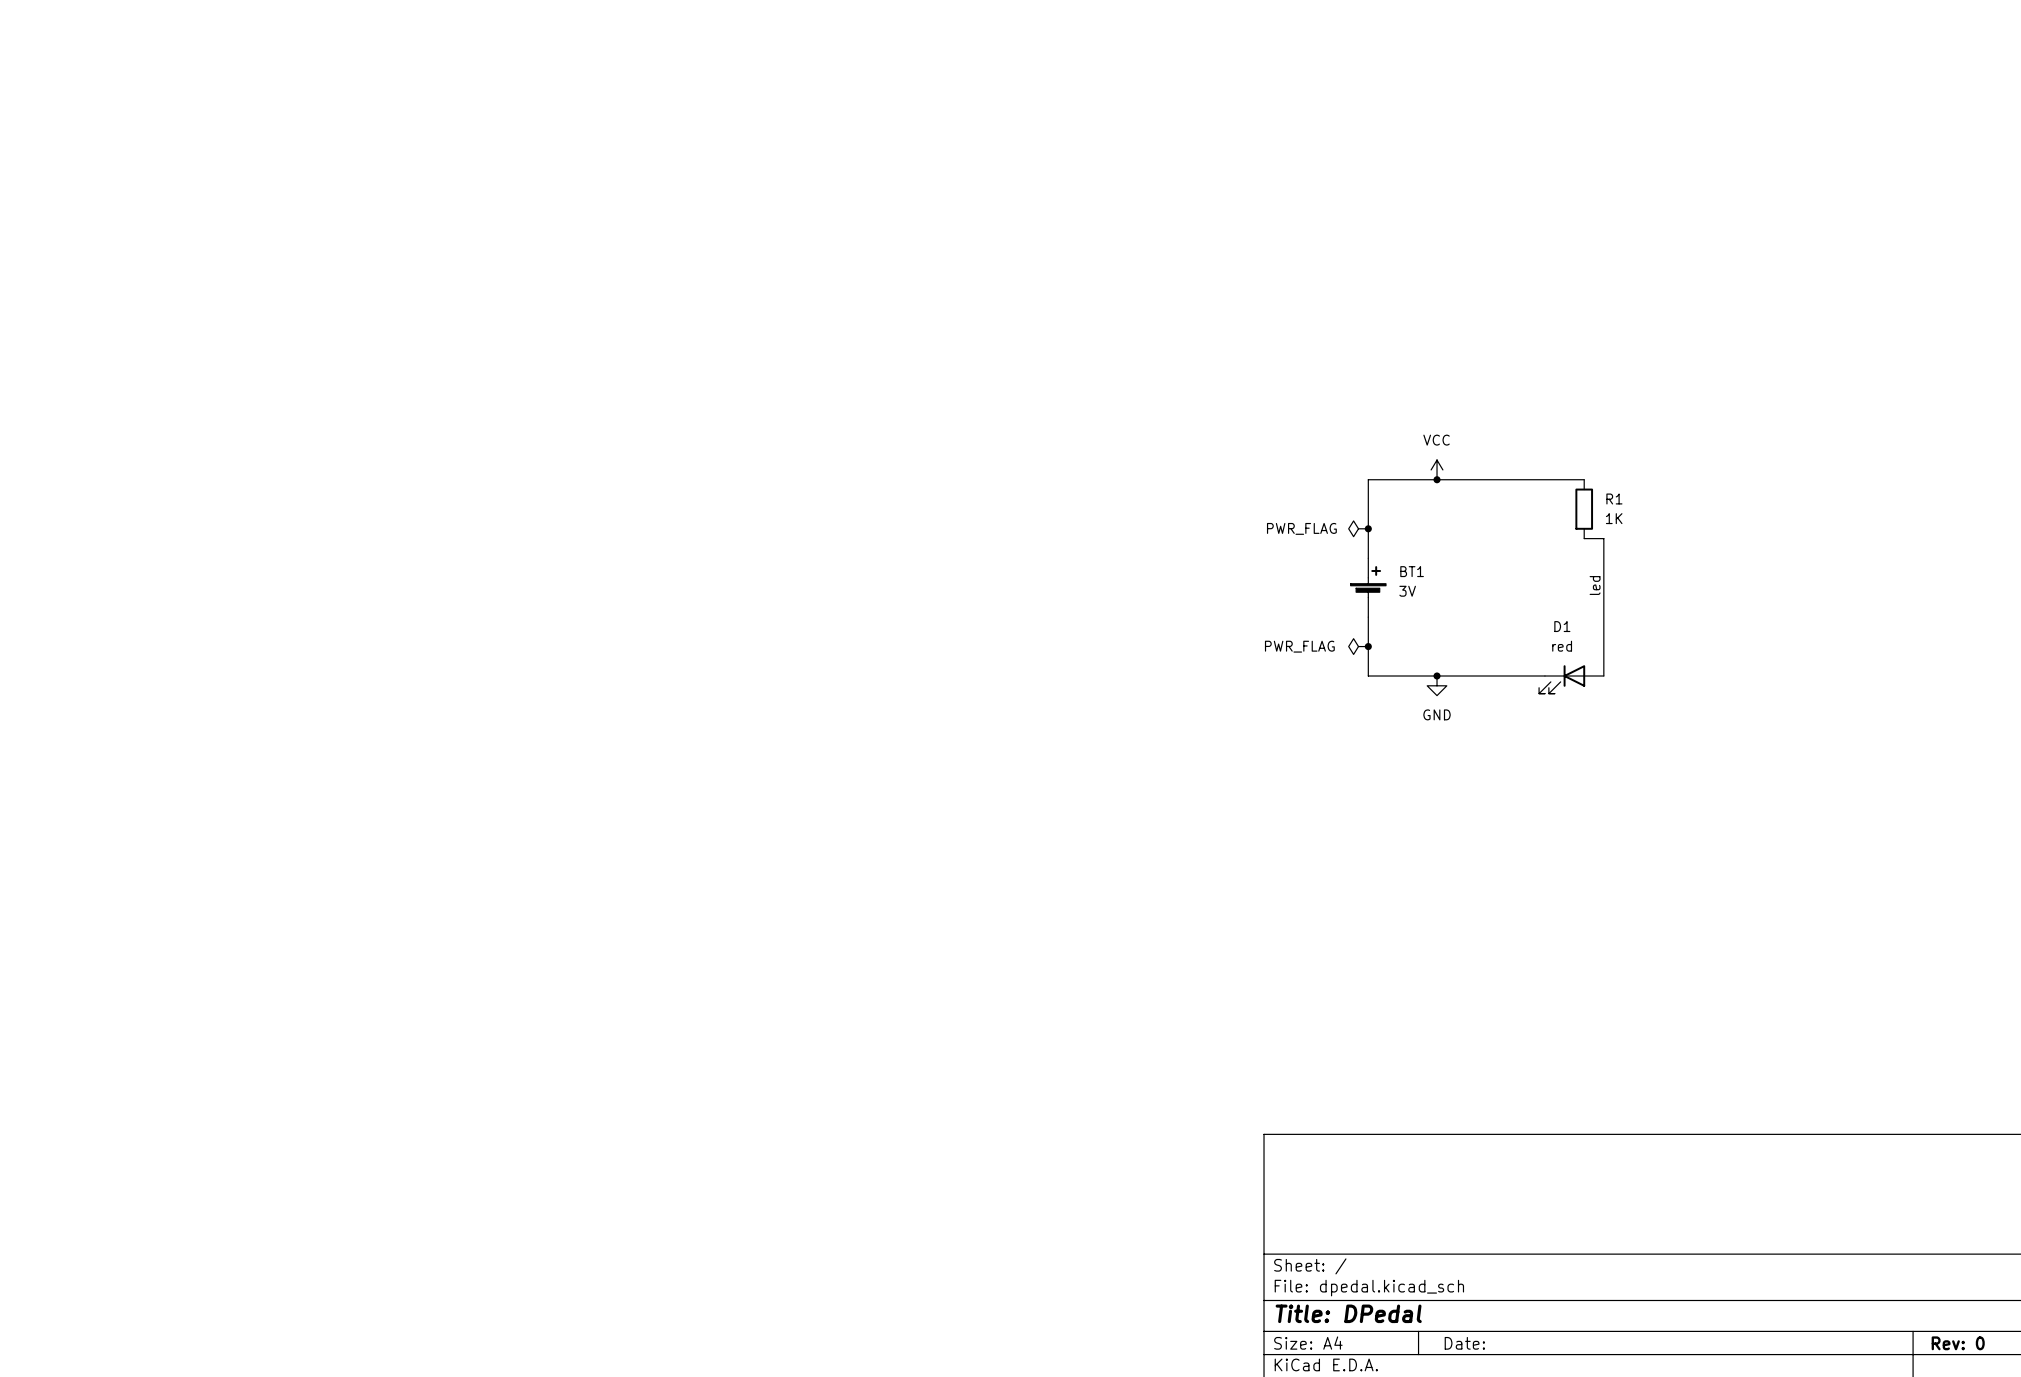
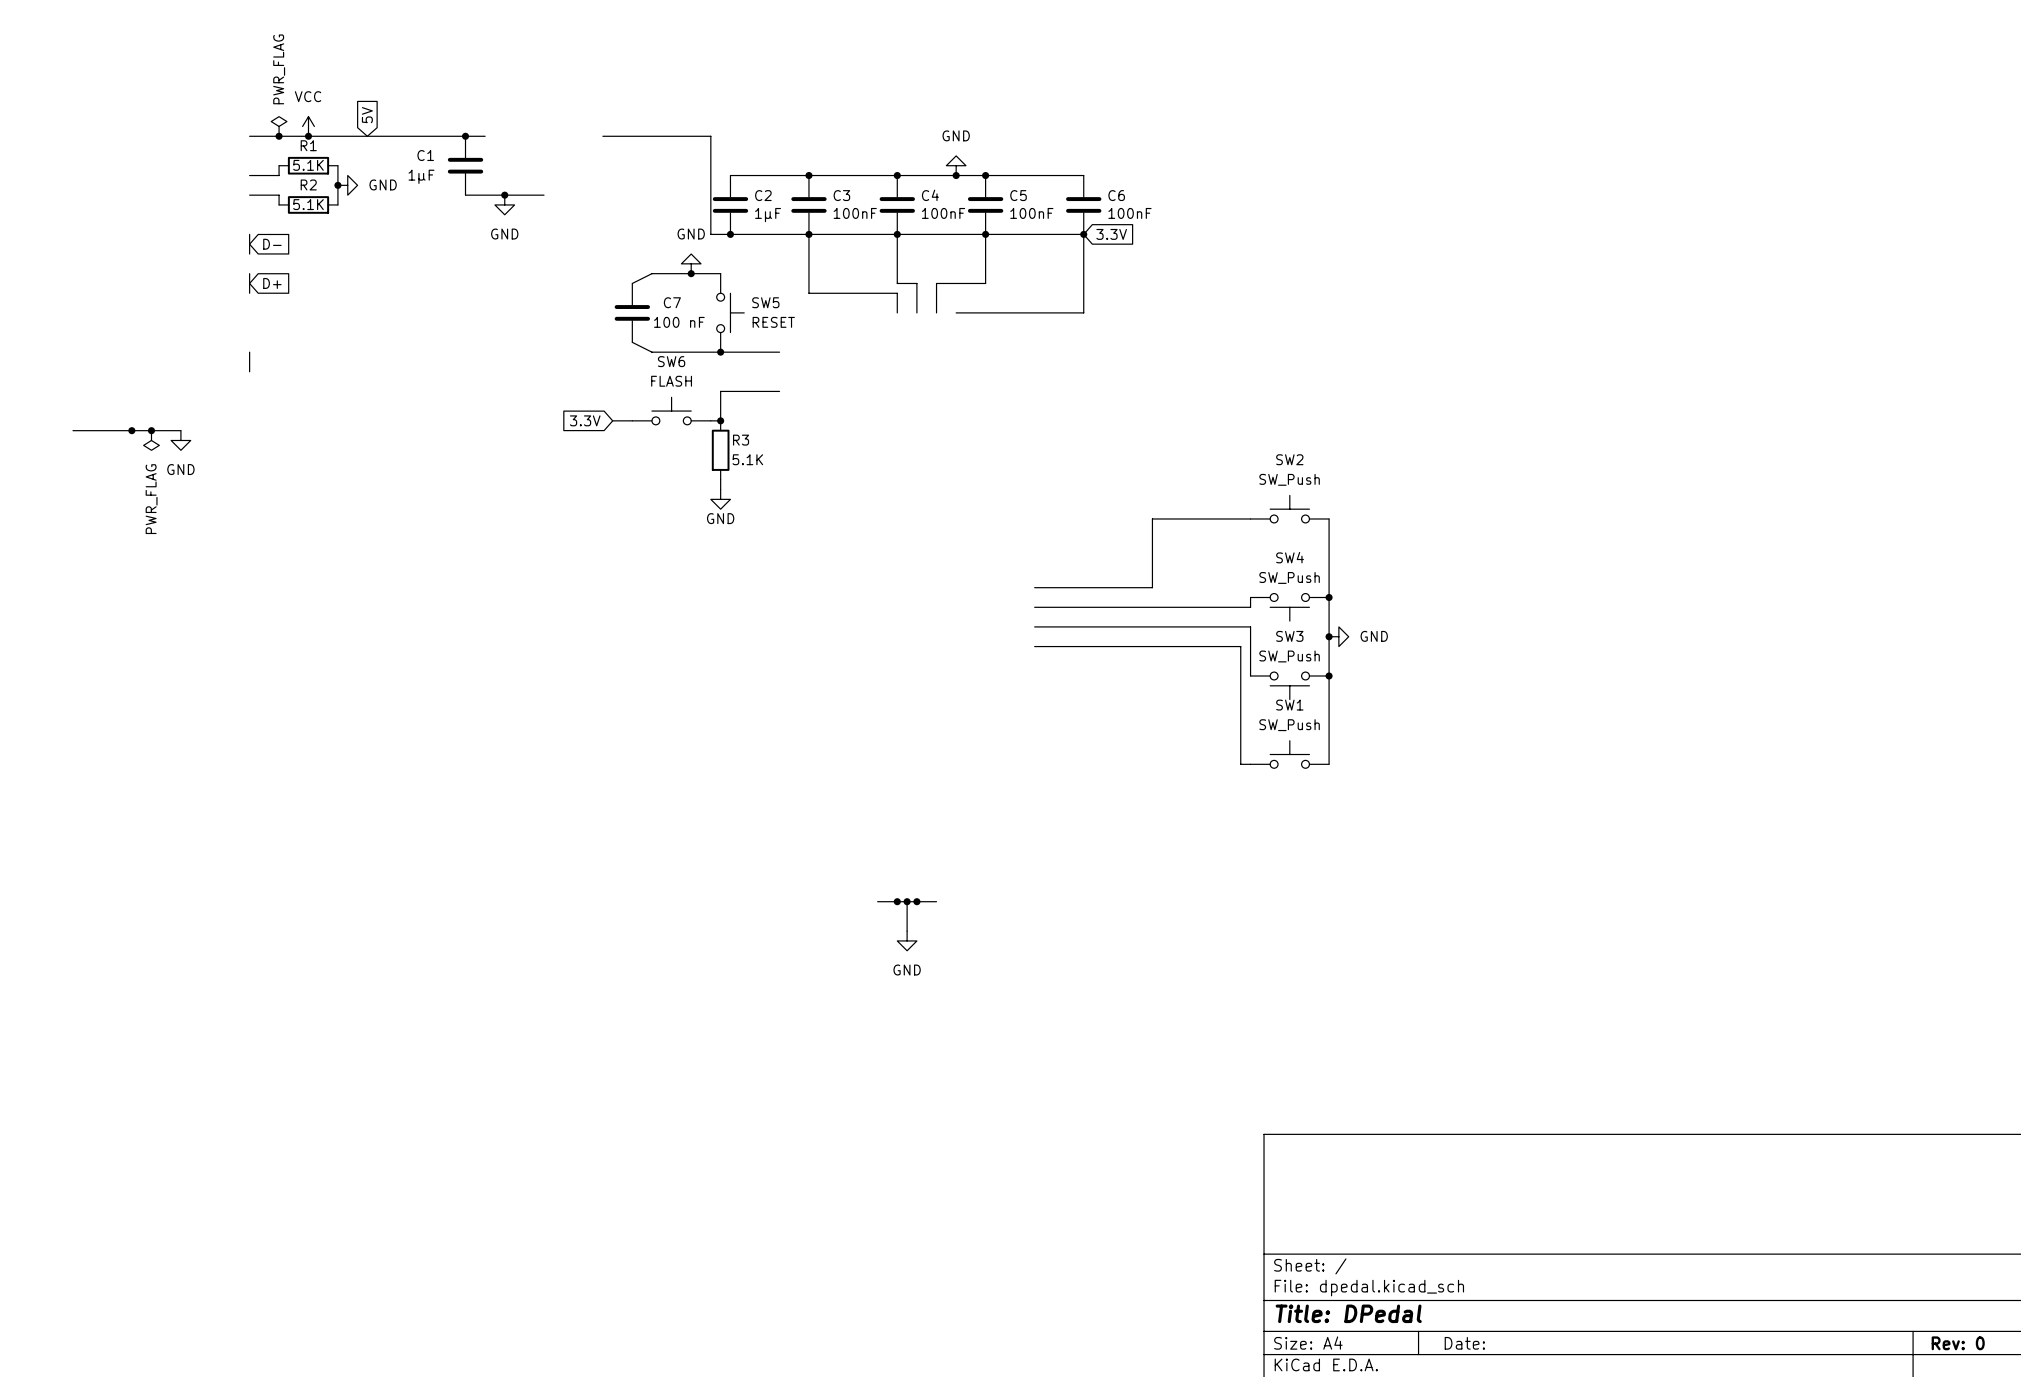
global label: none -> 5V (367, 115)
power symbol: none -> PWR_FLAG (279, 126)
power symbol: none -> VCC (308, 126)
wire: none -> (249, 136) (485, 136)
junction: none -> (279, 136)
junction: none -> (308, 136)
junction: none -> (465, 136)
wire: none -> (602, 136) (710, 136) (710, 234) (1083, 234) (1083, 312) (956, 312)
wire: none -> (279, 165) (279, 175) (249, 175)
wire: none -> (337, 165) (337, 204)
C1: none -> 1µF (465, 165)
power symbol: none -> GND (956, 165)
wire: none -> (730, 175) (1083, 175)
junction: none -> (808, 175)
junction: none -> (897, 175)
junction: none -> (956, 175)
junction: none -> (985, 175)
junction: none -> (337, 185)
power symbol: none -> GND (347, 185)
wire: none -> (249, 195) (279, 195) (279, 204)
wire: none -> (465, 195) (544, 195)
junction: none -> (504, 195)
R2: none -> 5.1K (308, 204)
power symbol: none -> GND (504, 204)
C2: none -> 1µF (730, 204)
C3: none -> 100nF (808, 204)
C4: none -> 100nF (897, 204)
C5: none -> 100nF (985, 204)
C6: none -> 100nF (1083, 204)
wire: none -> (249, 234) (249, 254)
junction: none -> (730, 234)
wire: none -> (808, 234) (808, 293) (897, 293) (897, 312)
junction: none -> (808, 234)
wire: none -> (897, 234) (897, 283) (916, 283) (916, 312)
junction: none -> (897, 234)
wire: none -> (985, 234) (985, 283) (936, 283) (936, 312)
junction: none -> (985, 234)
junction: none -> (1083, 234)
global label: none -> 3.3V (1111, 234)
global label: none -> D- (272, 244)
power symbol: none -> GND (691, 263)
wire: none -> (249, 273) (249, 293)
junction: none -> (691, 273)
wire: none -> (720, 273) (651, 273) (632, 283)
global label: none -> D+ (272, 283)
C7: none -> 100 nF (632, 312)
SW5: none -> RESET (730, 312)
wire: none -> (632, 342) (651, 352) (779, 352)
wire: none -> (249, 352) (249, 371)
junction: none -> (720, 352)
wire: none -> (779, 391) (720, 391) (720, 420) (710, 420)
SW6: none -> FLASH (671, 411)
global label: none -> 3.3V (585, 420)
wire: none -> (612, 420) (632, 420)
junction: none -> (720, 420)
wire: none -> (72, 430) (180, 430)
junction: none -> (131, 430)
junction: none -> (151, 430)
power symbol: none -> PWR_FLAG (151, 440)
power symbol: none -> GND (180, 440)
R3: none -> 5.1K (720, 450)
power symbol: VCC (1437, 469) -> none
wire: none -> (720, 479) (720, 489)
junction: (1437, 479) -> none
wire: (1584, 479) (1368, 479) (1368, 558) -> none
R1 name position: R1 (1614, 498) -> R1 (308, 145)
power symbol: none -> GND (720, 499)
SW2: none -> SW_Push (1289, 509)
R1 rotation: 0° (1584, 509) -> 90° clockwise (308, 165)
R1 position: (1584, 509) -> (308, 165)
wire: none -> (1250, 518) (1152, 518) (1152, 587) (1034, 587)
wire: none -> (1329, 518) (1329, 764)
R1 value: 1K (1614, 518) -> 5.1K (308, 165)
power symbol: PWR_FLAG (1358, 528) -> none
junction: (1368, 528) -> none
wire: (1584, 538) (1603, 538) (1603, 676) -> none
label: led (1595, 585) -> none
BT1: 3V (1368, 587) -> none
wire: none -> (1250, 597) (1250, 607) (1034, 607)
junction: none -> (1329, 597)
SW4: none -> SW_Push (1289, 607)
wire: (1368, 617) (1368, 676) (1544, 676) -> none
wire: none -> (1034, 626) (1250, 626) (1250, 676)
junction: none -> (1329, 636)
wire: none -> (1034, 646) (1240, 646) (1240, 764) (1250, 764)
power symbol: PWR_FLAG (1358, 646) -> none
junction: (1368, 646) -> none
junction: none -> (1329, 676)
junction: (1437, 676) -> none
D1: red (1571, 679) -> none
SW3: none -> SW_Push (1289, 685)
power symbol rotation: 0° (1437, 685) -> 90° counterclockwise (1338, 636)
power symbol position: GND (1437, 685) -> GND (1338, 636)
SW1: none -> SW_Push (1289, 754)
wire: none -> (877, 901) (936, 901)
junction: none -> (897, 901)
wire: none -> (907, 901) (907, 931)
junction: none -> (907, 901)
junction: none -> (916, 901)
power symbol: none -> GND (907, 940)

